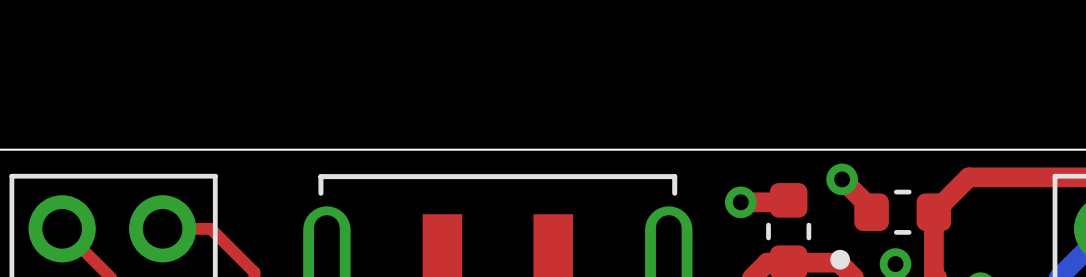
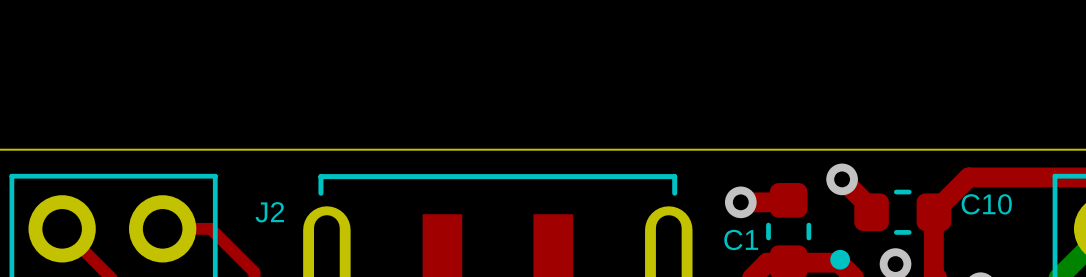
text: none -> C10 (986, 204)
text: none -> J2 (269, 212)
text: none -> C1 (741, 239)

